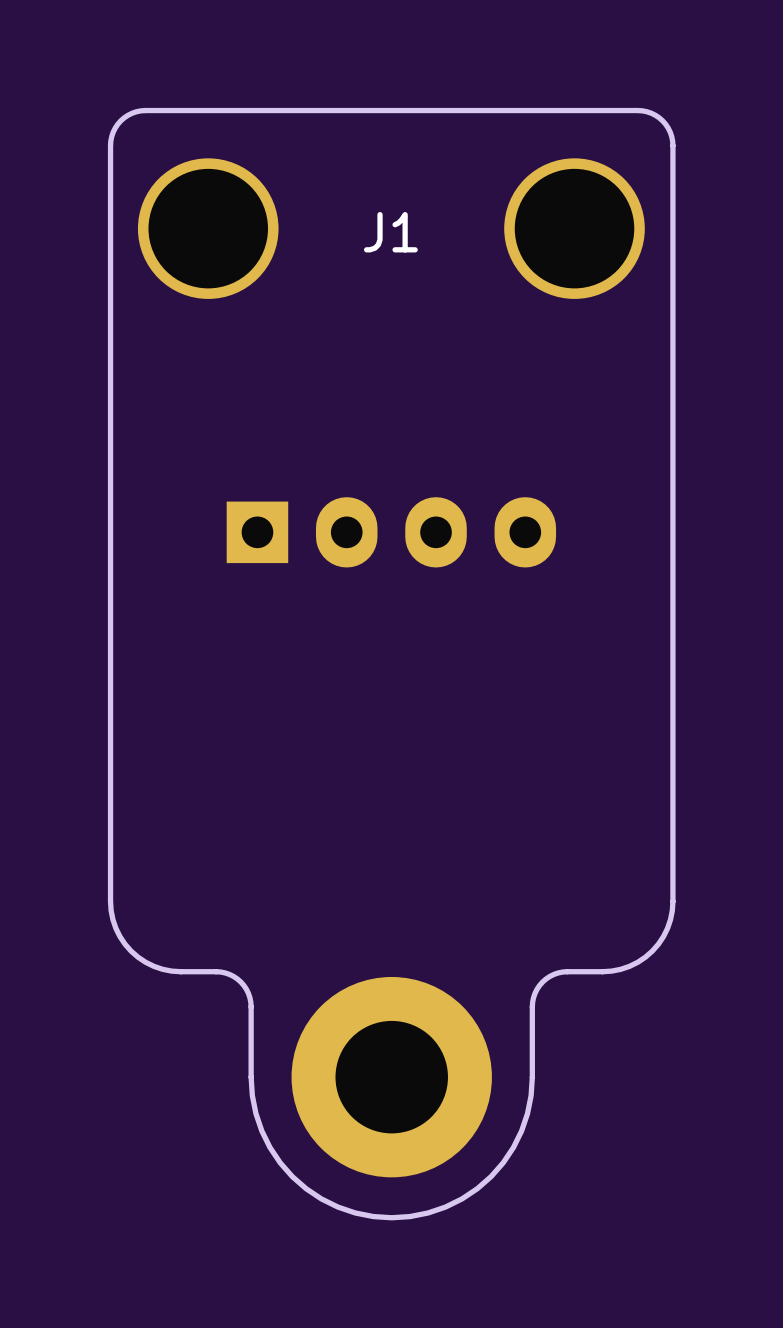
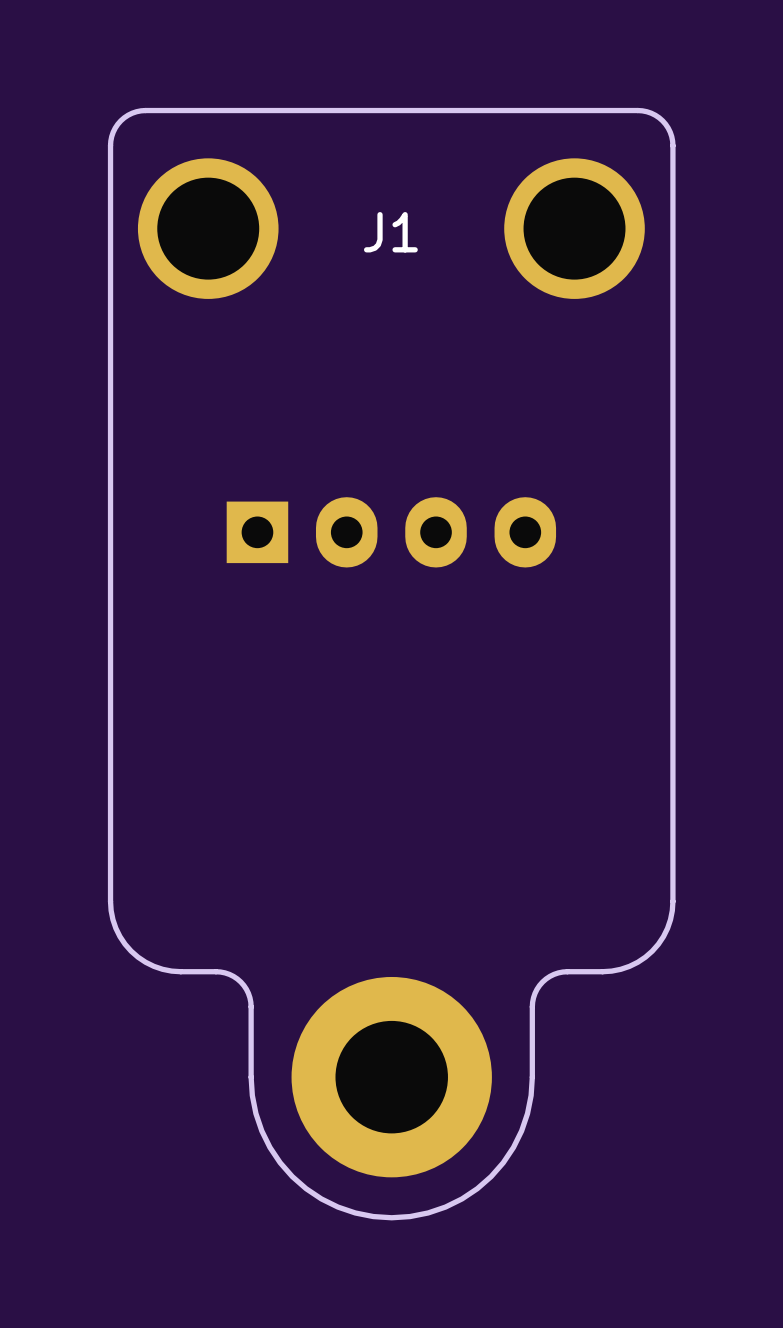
J1 footprint: [137, 158, 645, 568] -> [137, 158, 645, 568]

